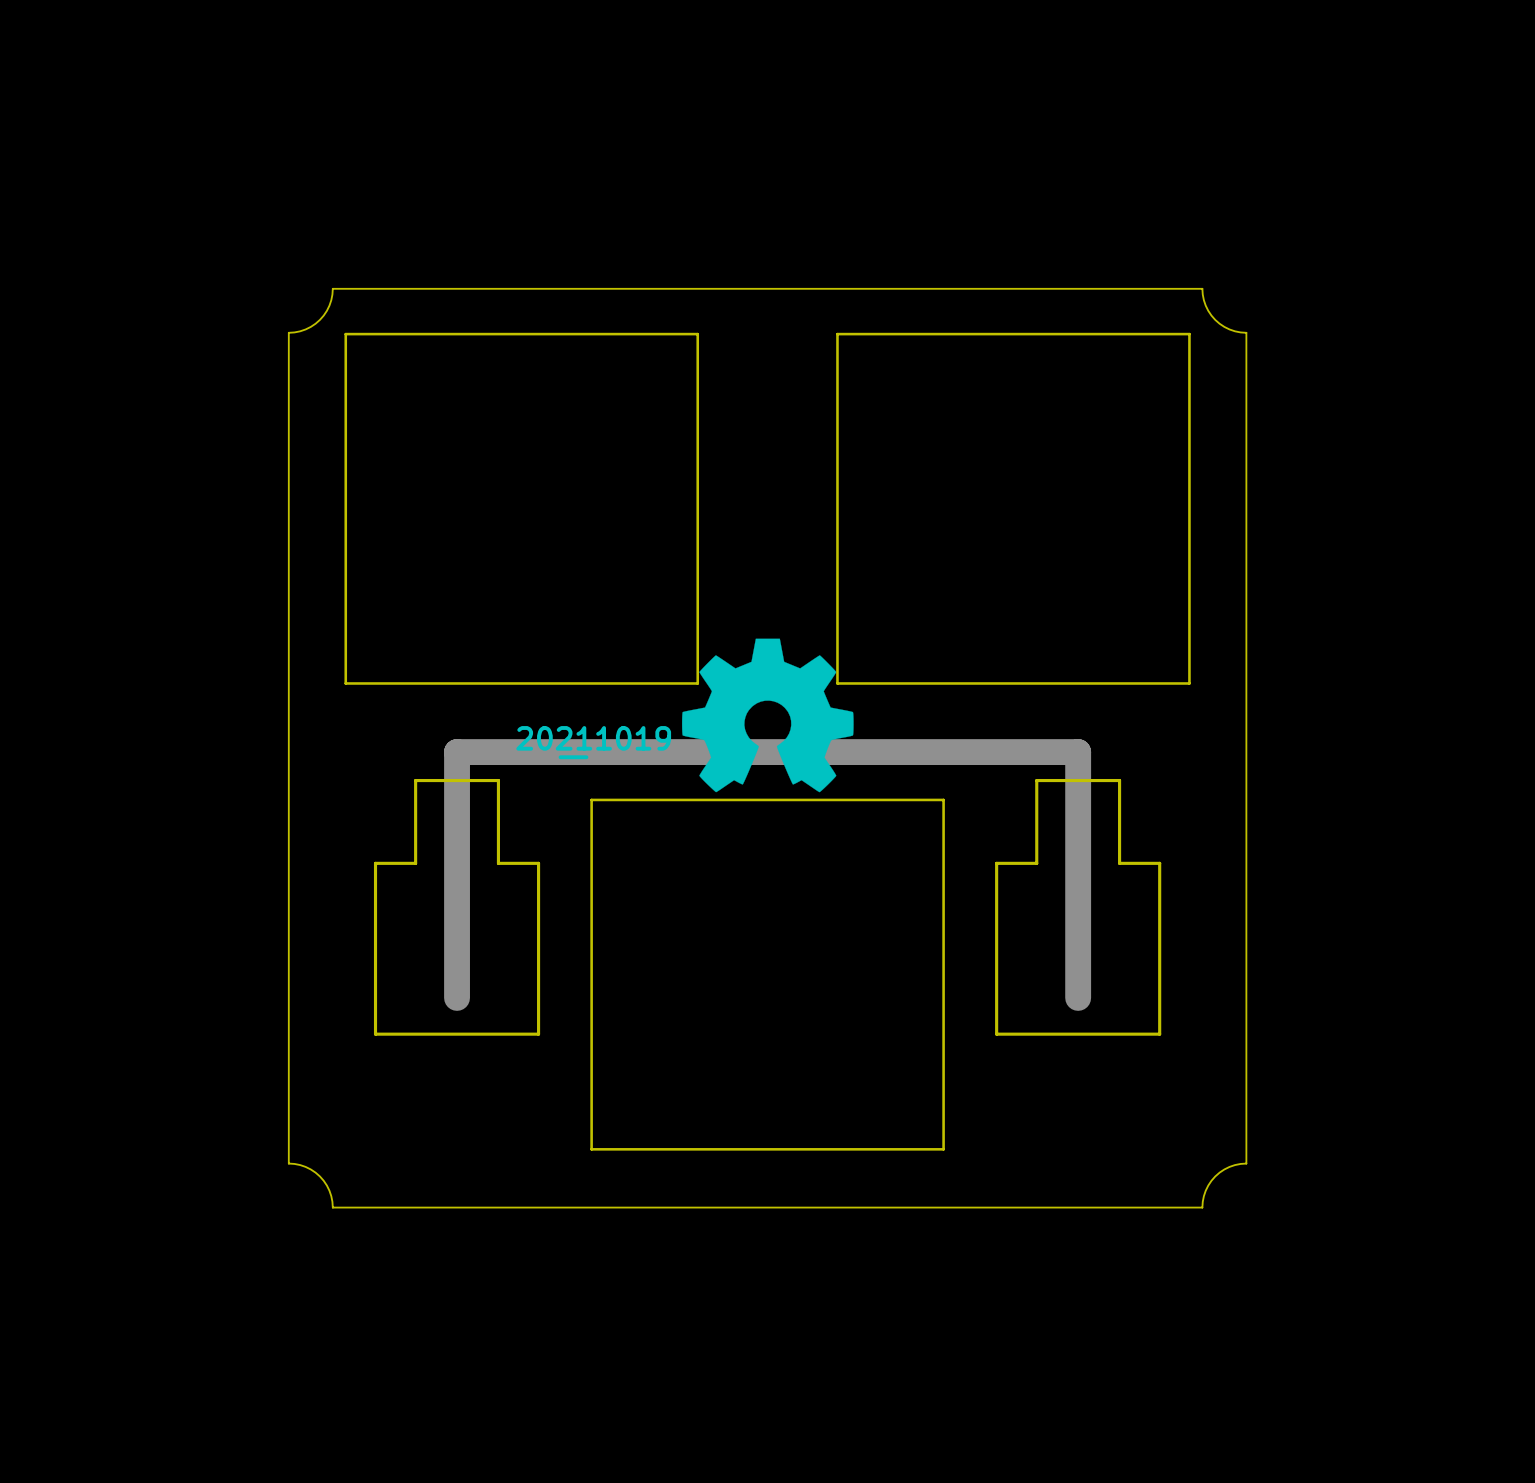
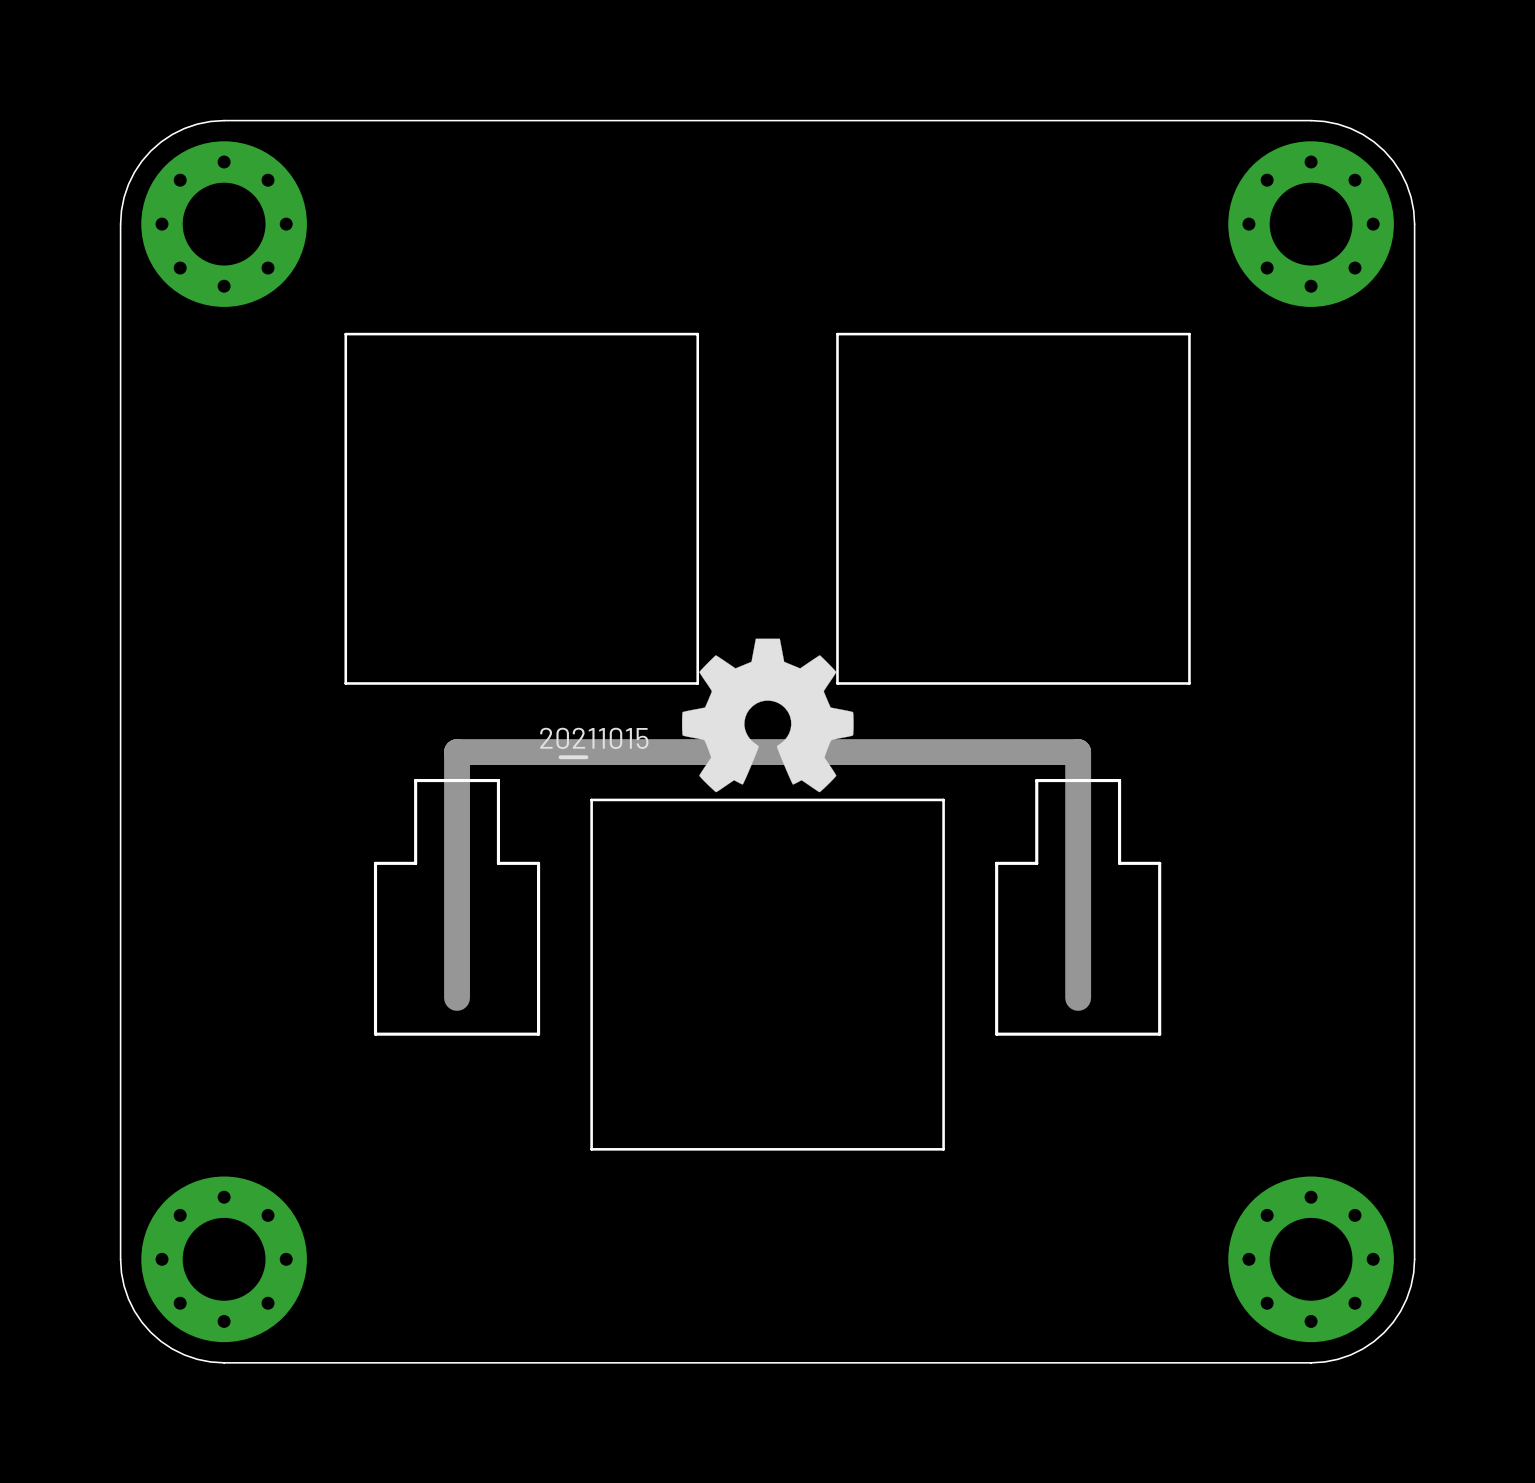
part: none -> (224, 224)
part: none -> (1311, 224)
board edge: (1202, 288) (332, 288) (329, 305) (319, 319) (305, 329) (288, 332) (288, 1163) (305, 1166) (319, 1176) (329, 1190) (332, 1207) (1202, 1207) (1205, 1190) (1215, 1176) (1229, 1166) (1246, 1163) (1246, 332) (1229, 329) (1215, 319) (1205, 305) (1202, 288) -> (1311, 120) (1324, 121) (1350, 128) (1374, 141) (1384, 150) (1400, 172) (1406, 184) (1411, 197) (1414, 224) (1414, 1259) (1411, 1286) (1406, 1298) (1400, 1311) (1384, 1332) (1374, 1341) (1350, 1354) (1337, 1359) (1311, 1362) (224, 1362) (197, 1359) (184, 1354) (161, 1341) (150, 1332) (134, 1311) (128, 1298) (124, 1286) (120, 1259) (120, 224) (124, 197) (128, 184) (134, 172) (150, 150) (161, 141) (184, 128) (210, 121) (224, 120) (1311, 120)
drawing shape: [516, 726, 672, 760] -> [540, 727, 649, 760]
part: none -> (224, 1259)
part: none -> (1311, 1259)

